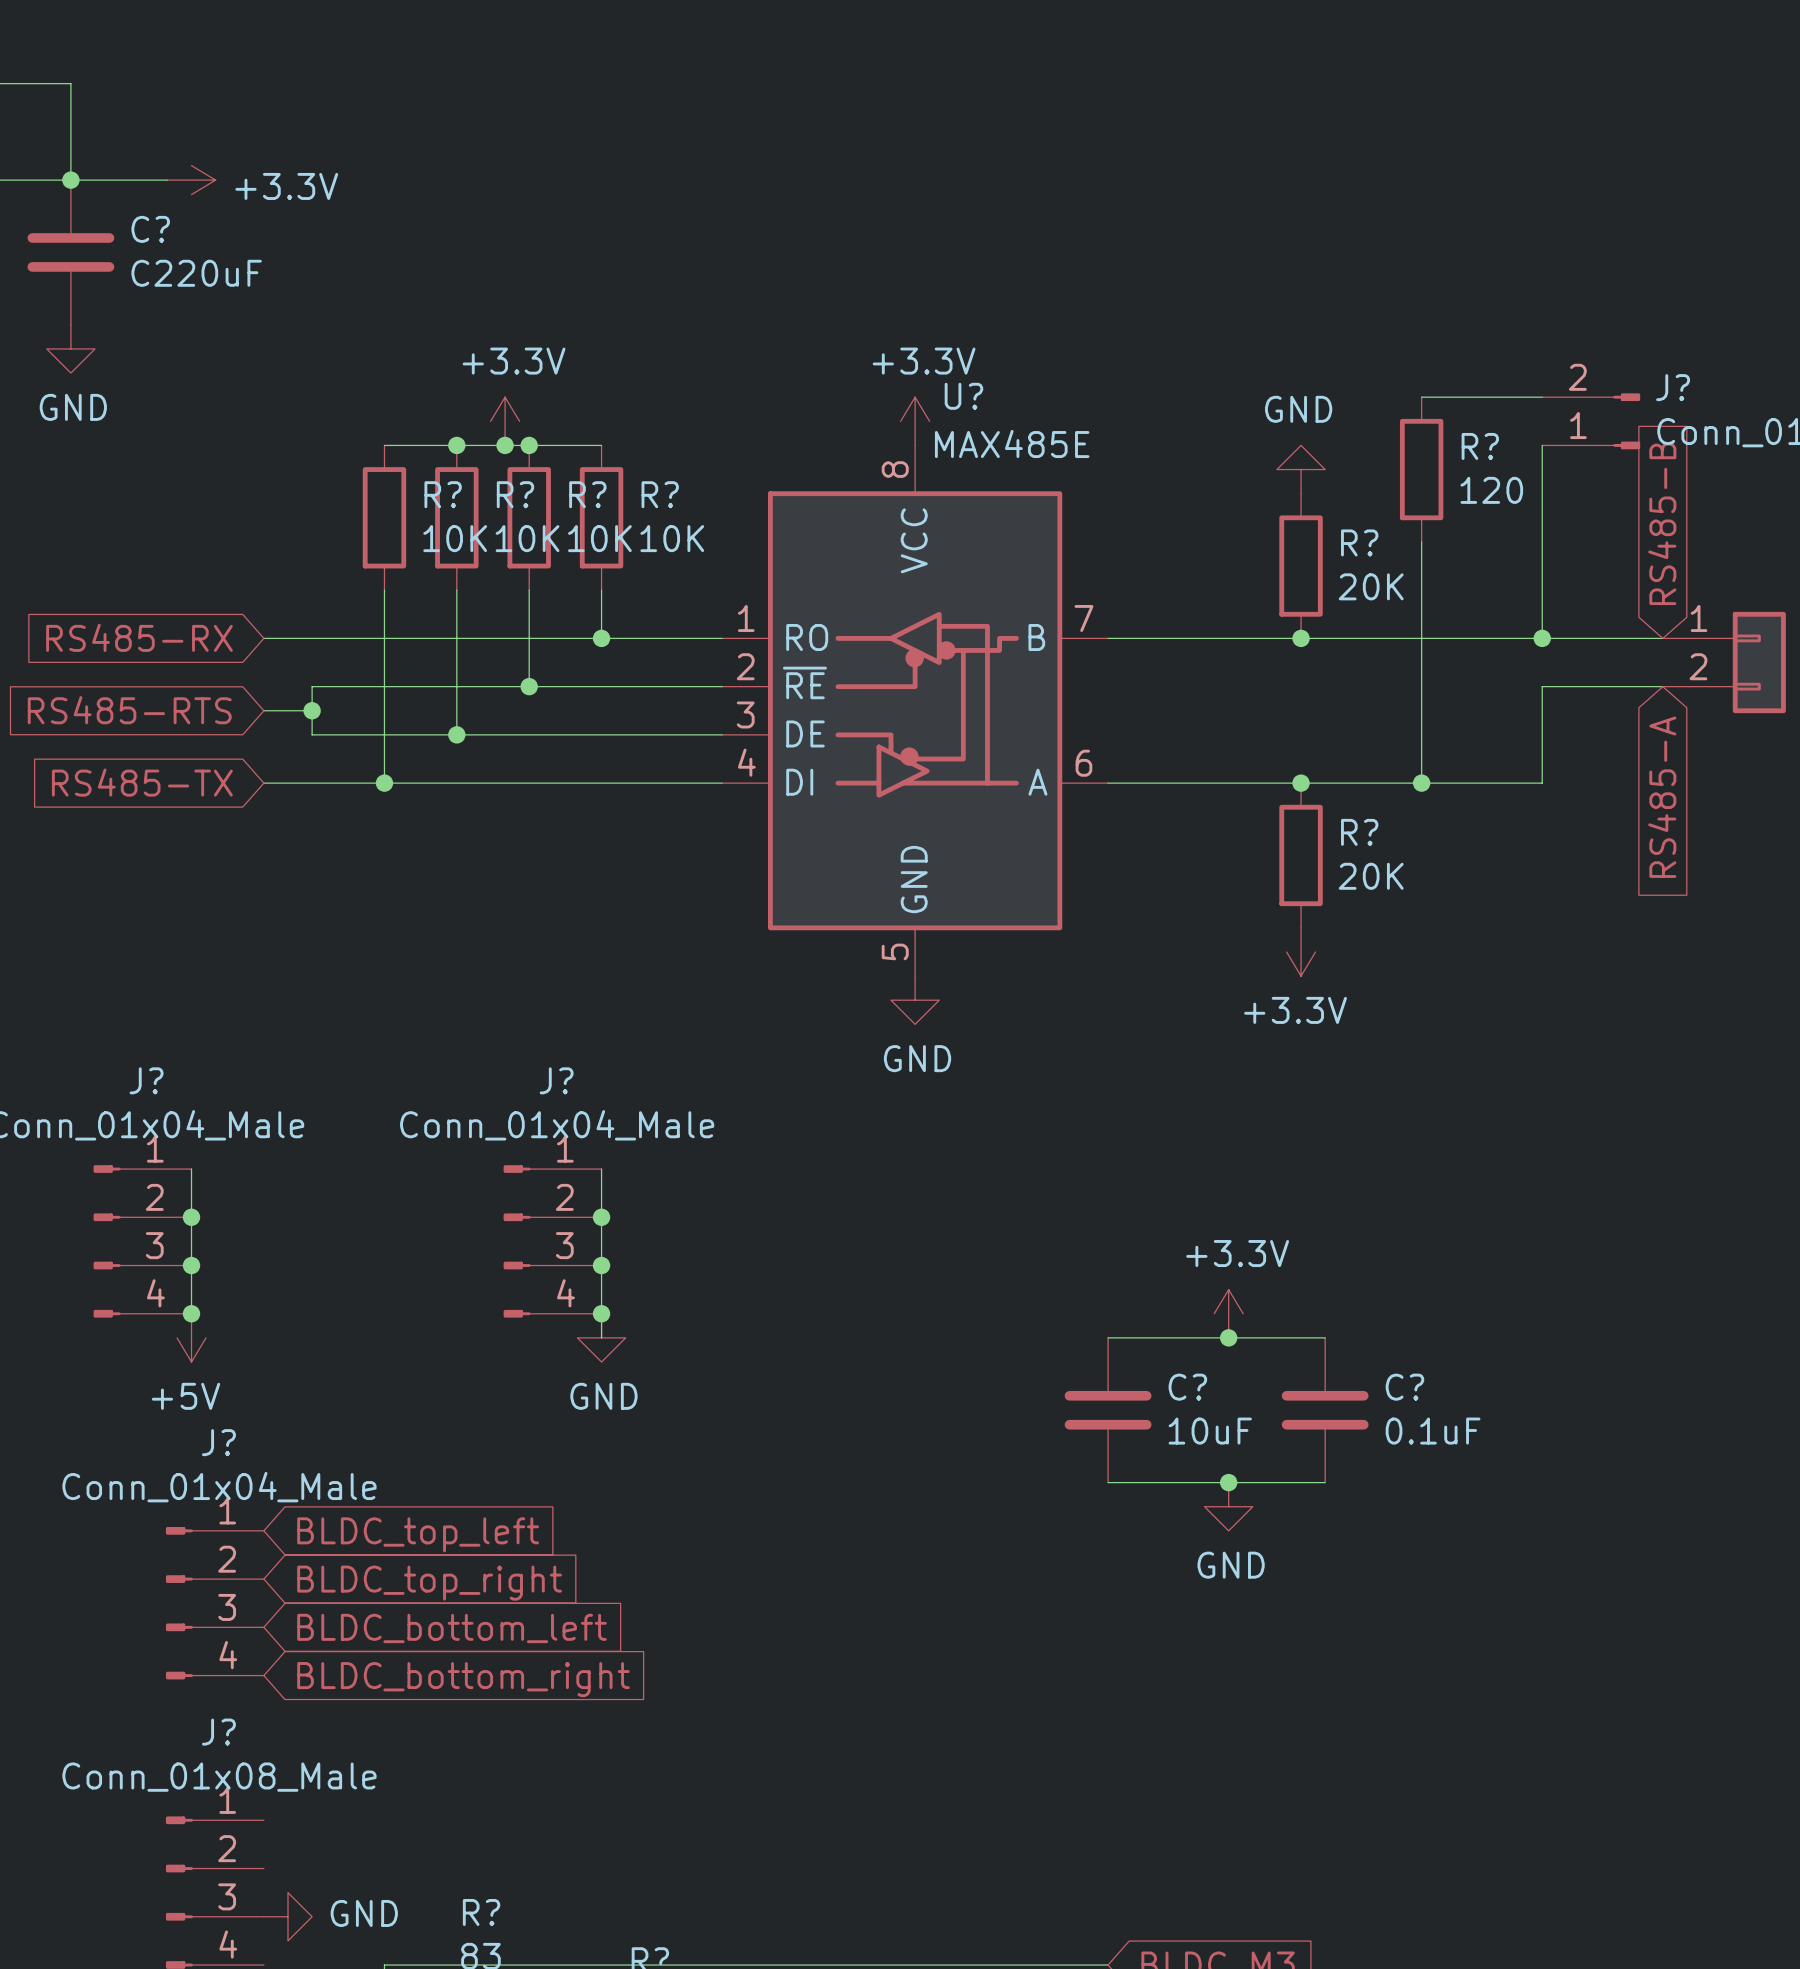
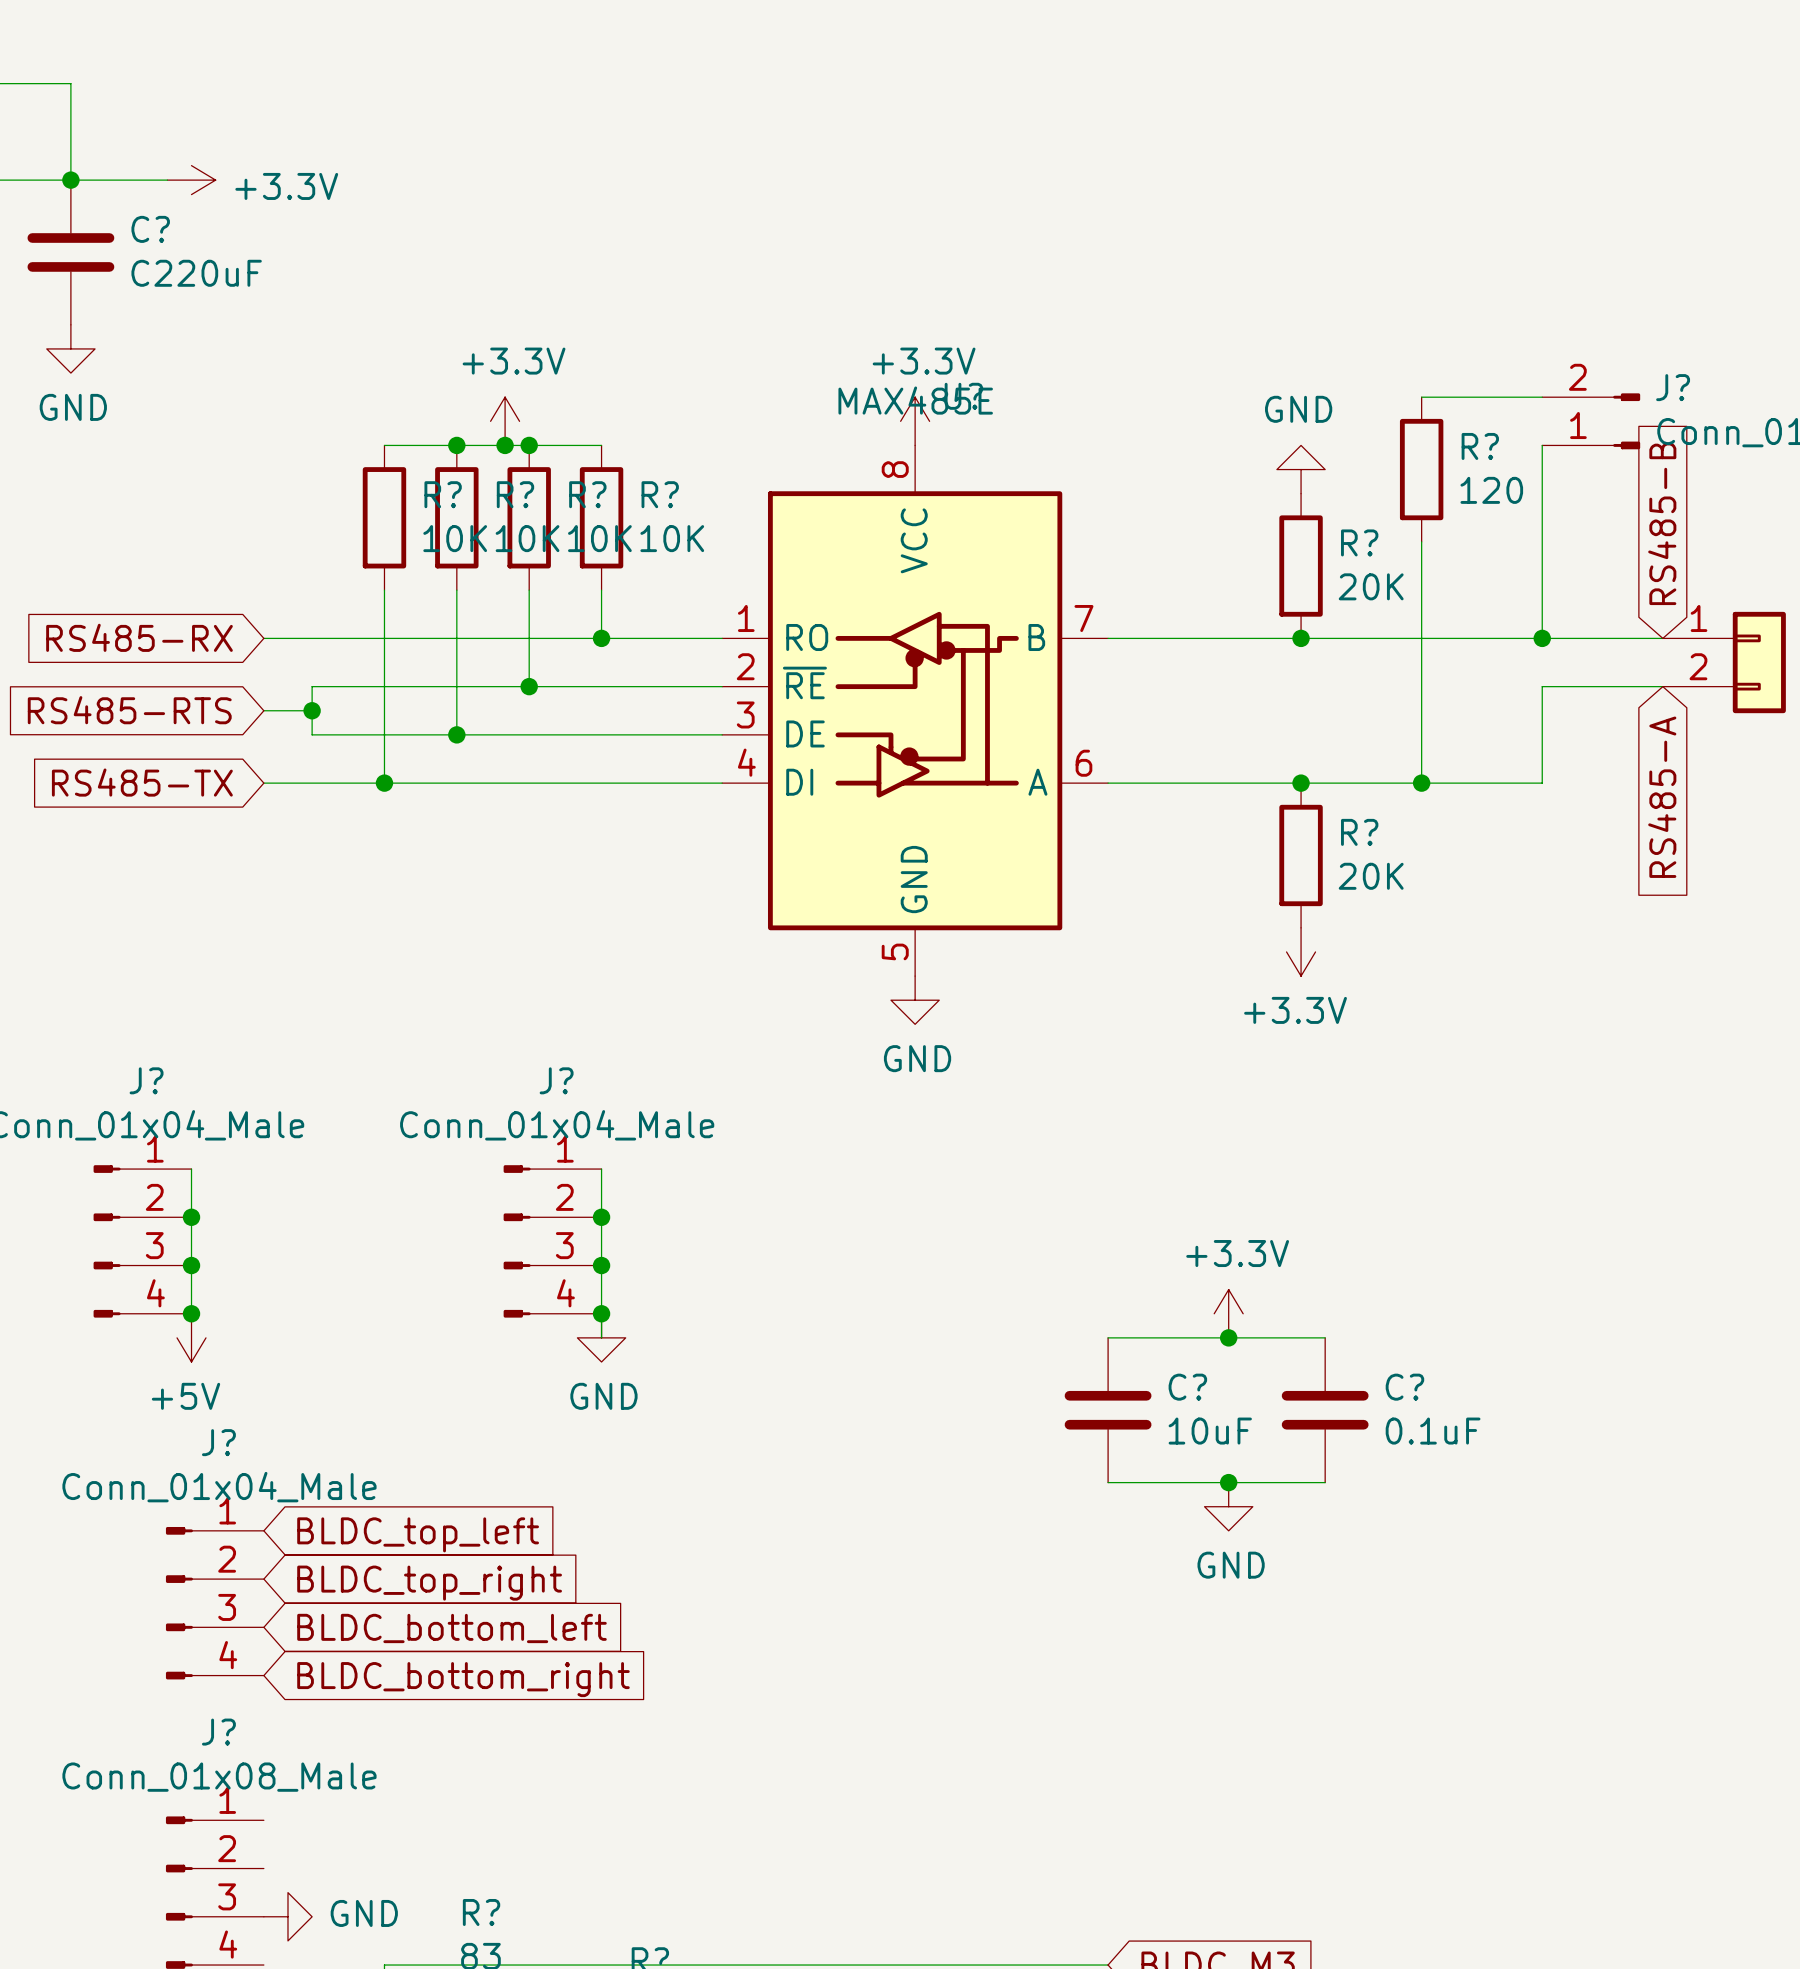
U? value position: MAX485E (1012, 443) -> MAX485E (915, 400)

